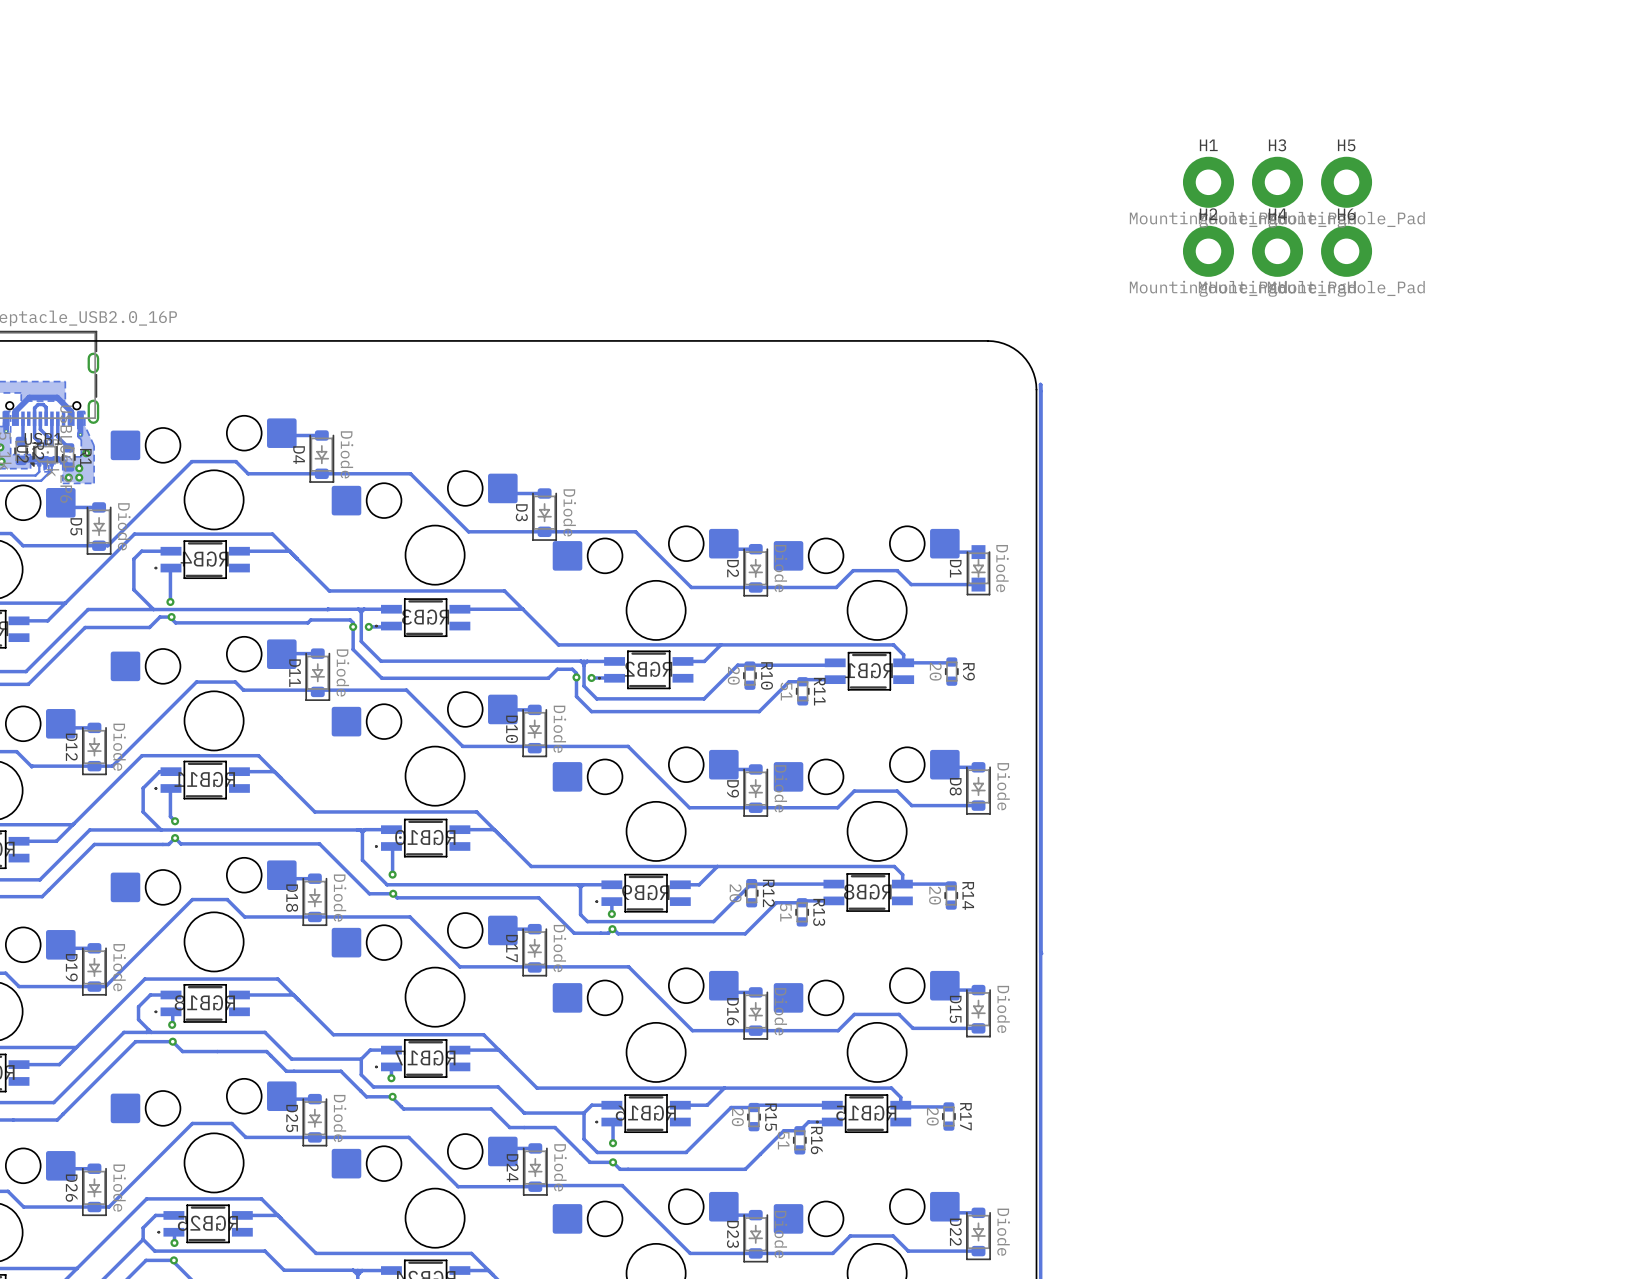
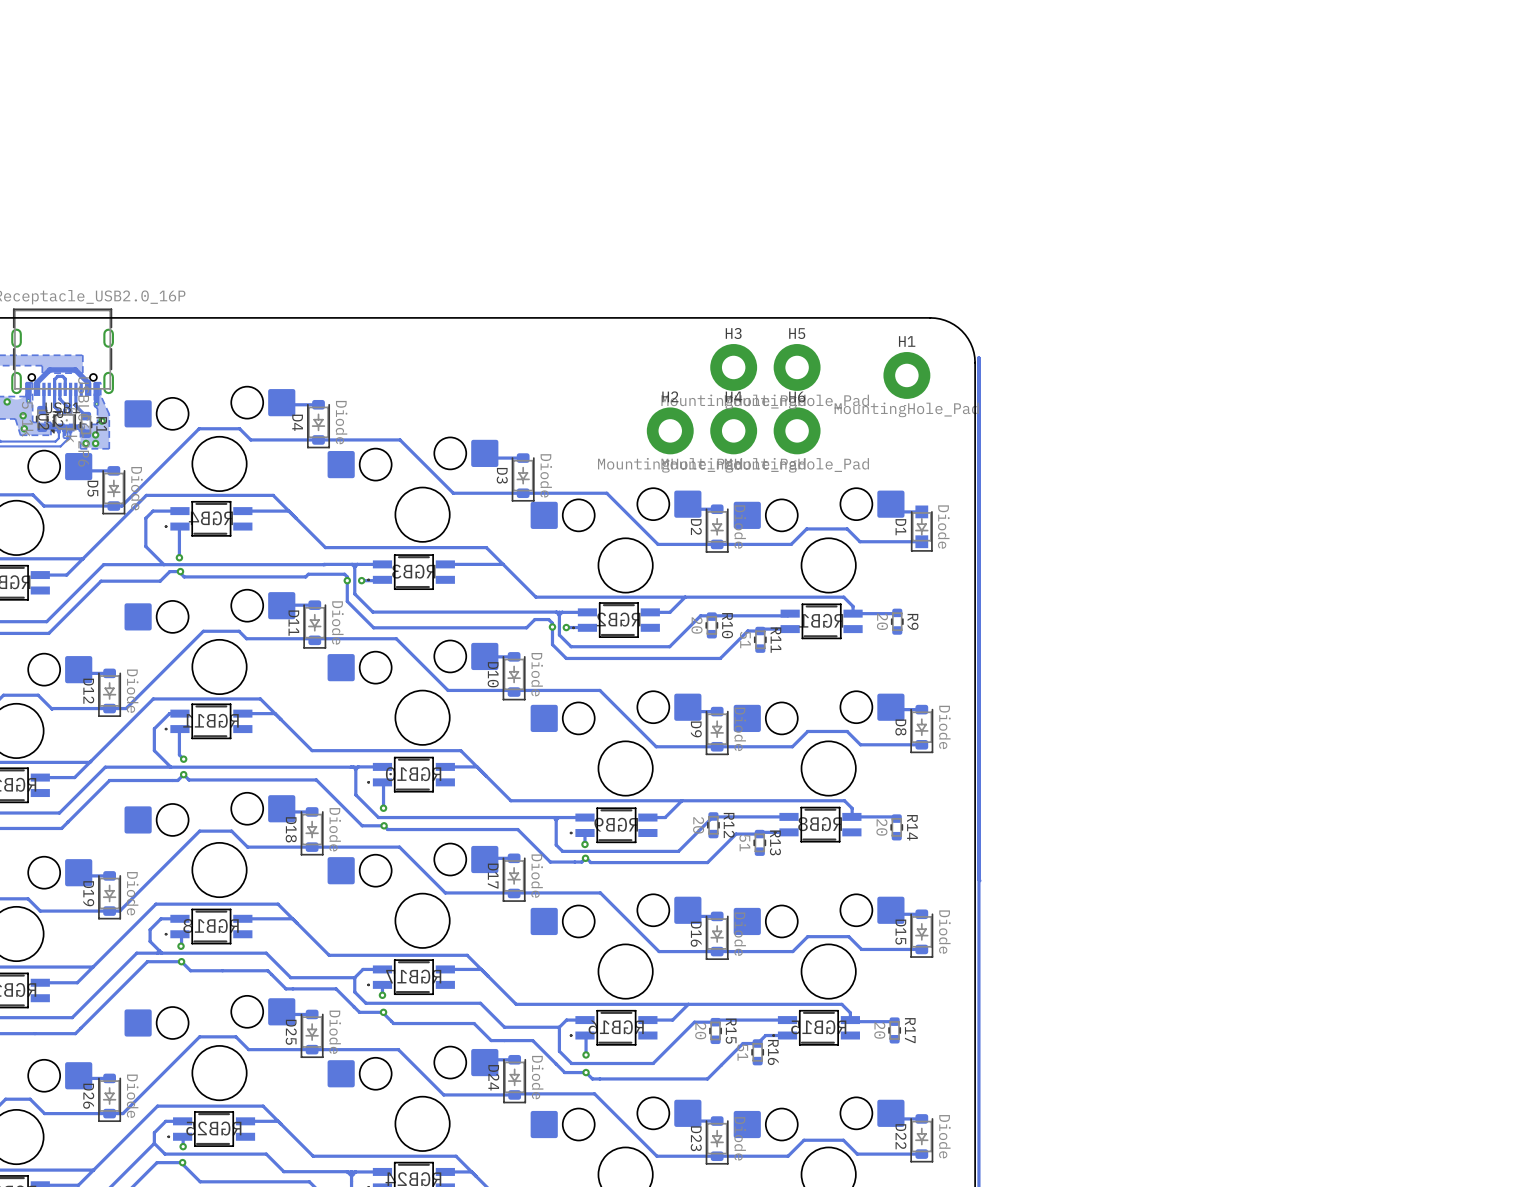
H1 position: (1208, 182) -> (906, 375)
H3 position: (1277, 182) -> (733, 367)
H5 position: (1346, 182) -> (797, 367)
H2 position: (1208, 251) -> (670, 430)
H4 position: (1277, 251) -> (733, 430)
H6 position: (1346, 251) -> (797, 430)

